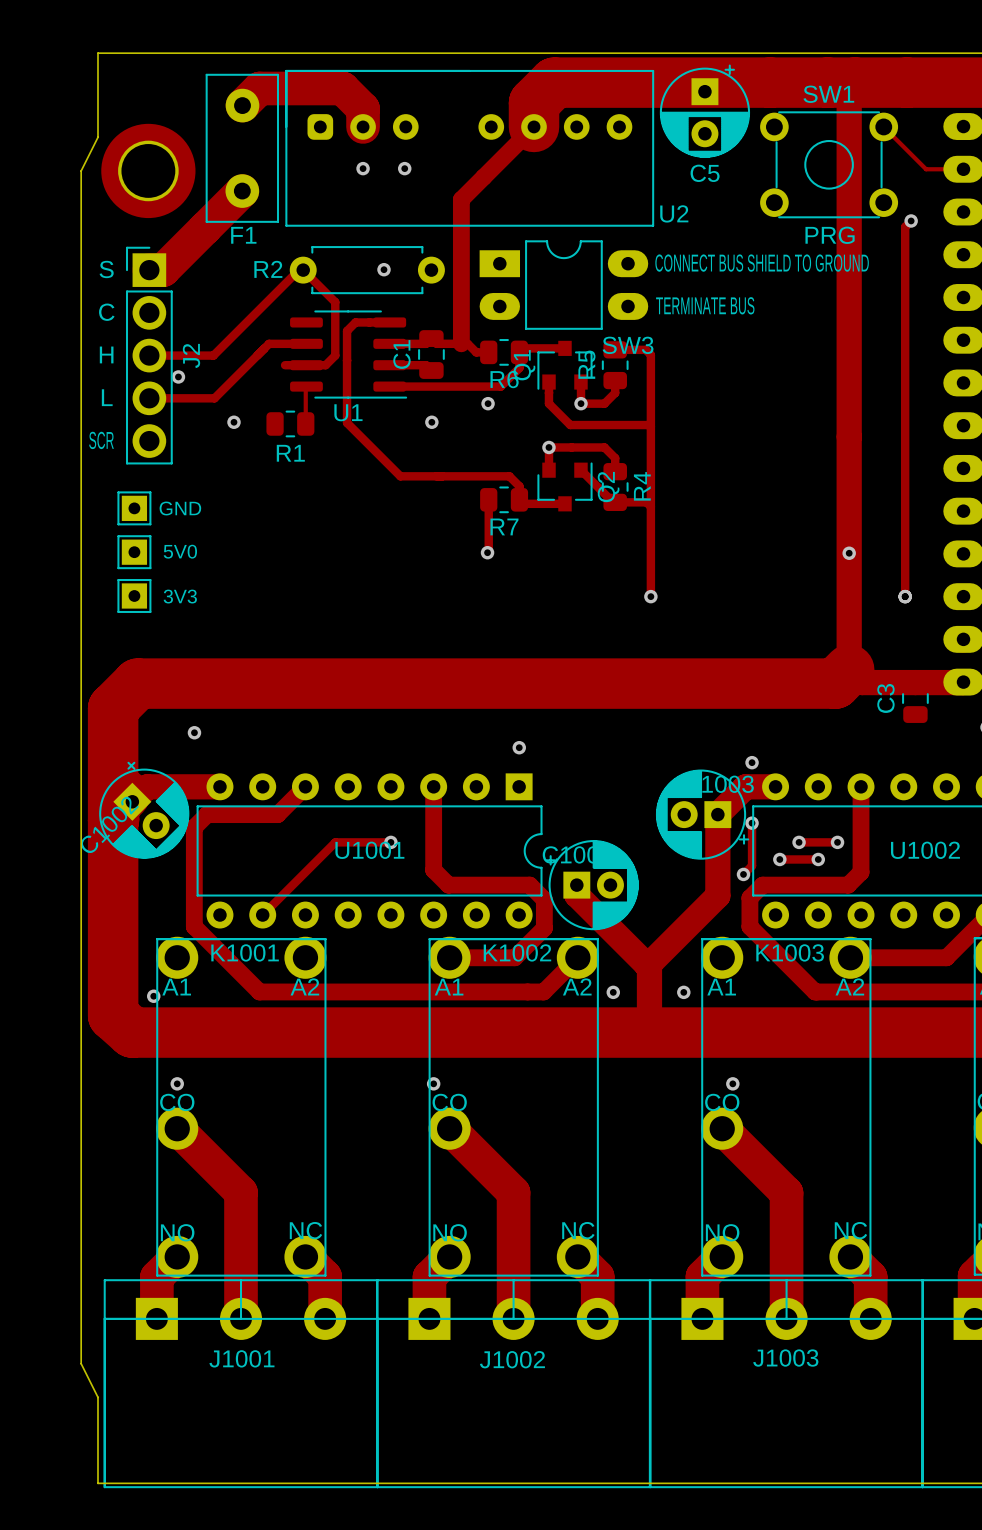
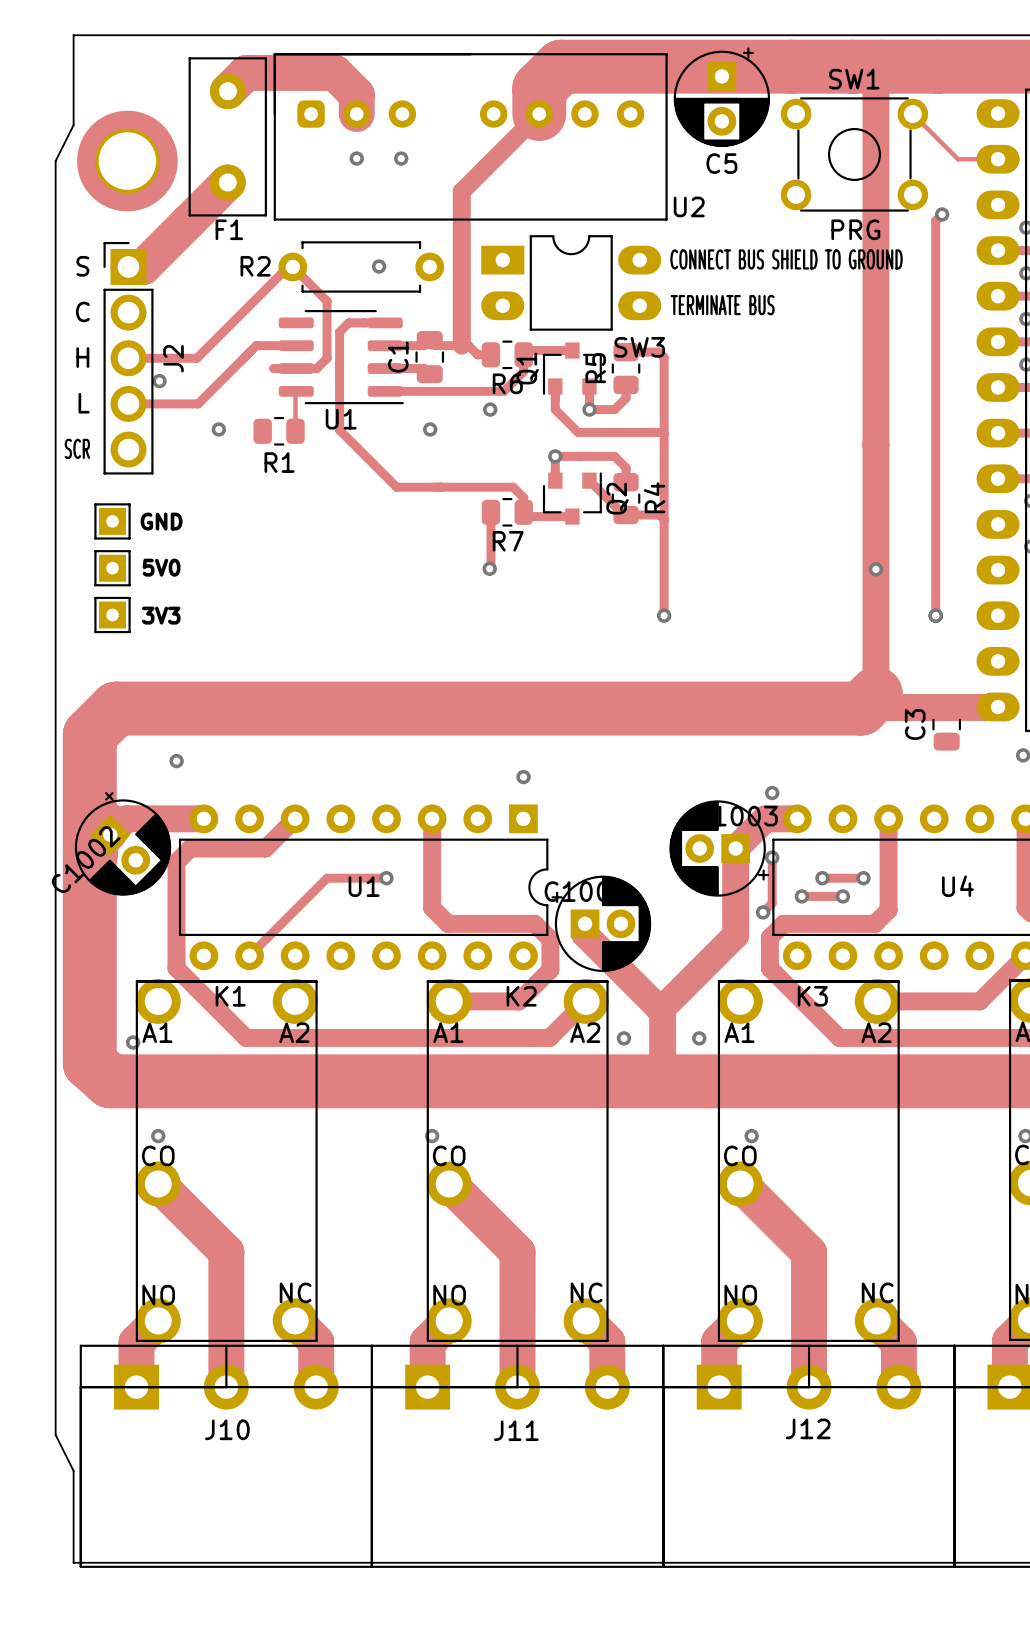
U1001 name: U1001 (369, 850) -> U1 (364, 886)
U1002 name: U1002 (925, 850) -> U4 (957, 886)
K1001 name: K1001 (245, 952) -> K1 (230, 996)
K1002 name: K1002 (517, 952) -> K2 (521, 996)
K1003 name: K1003 (790, 952) -> K3 (812, 996)
J1001 name: J1001 (241, 1358) -> J10 (227, 1429)
J1003 name: J1003 (785, 1358) -> J12 (808, 1428)
J1002 name: J1002 (512, 1359) -> J11 (516, 1430)

